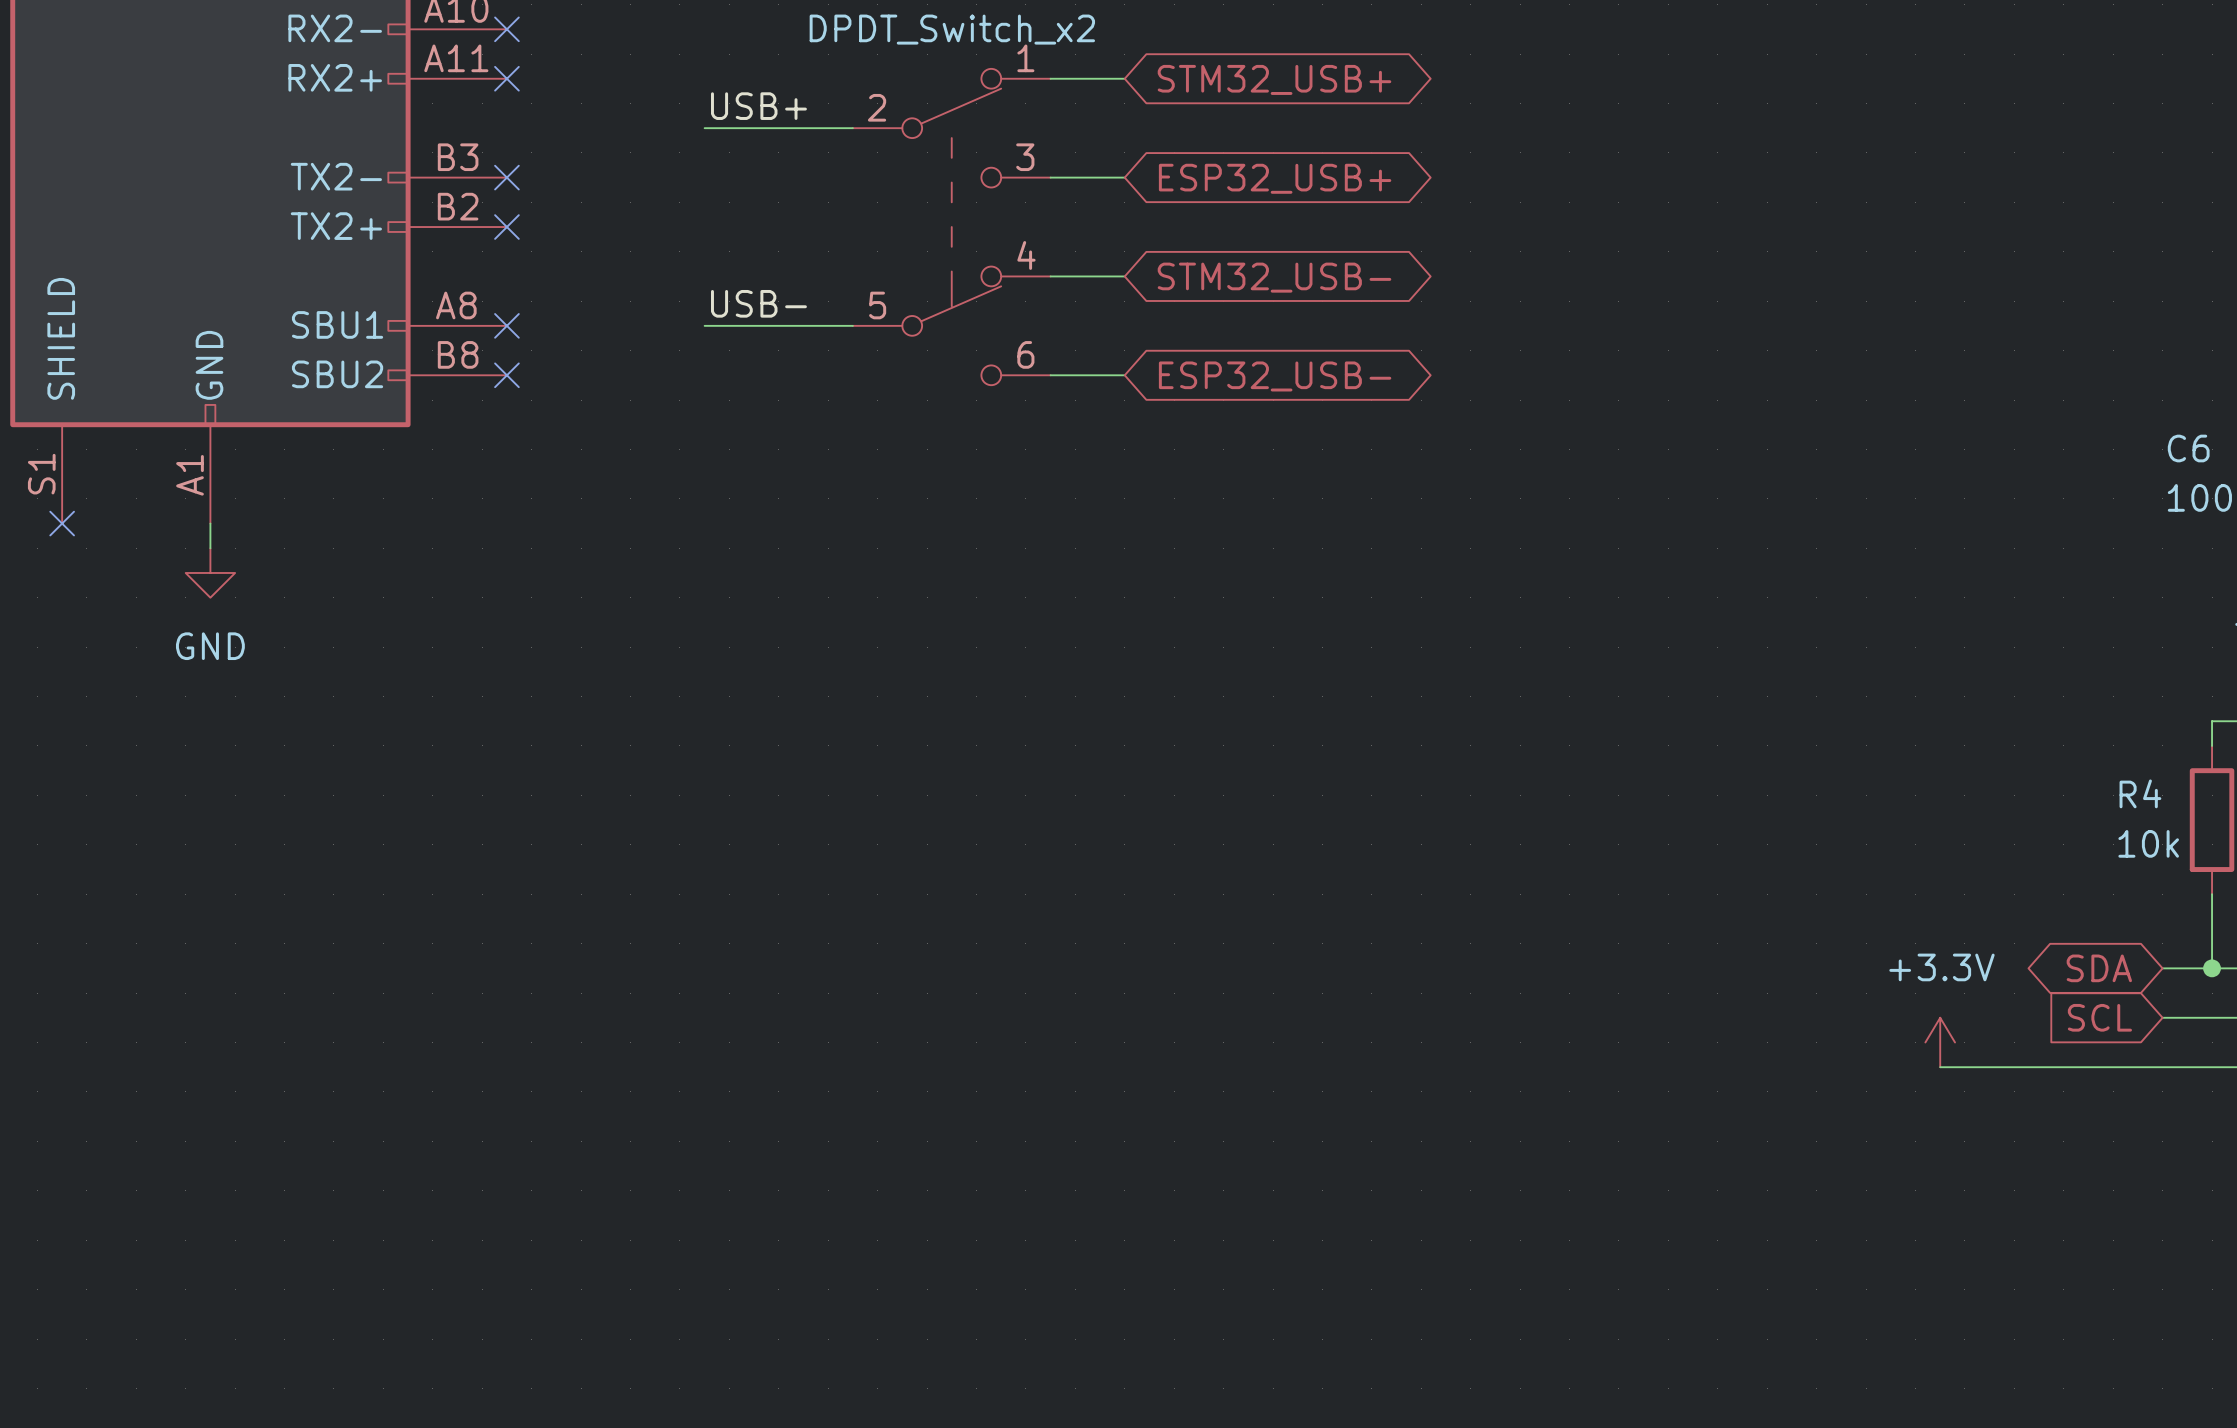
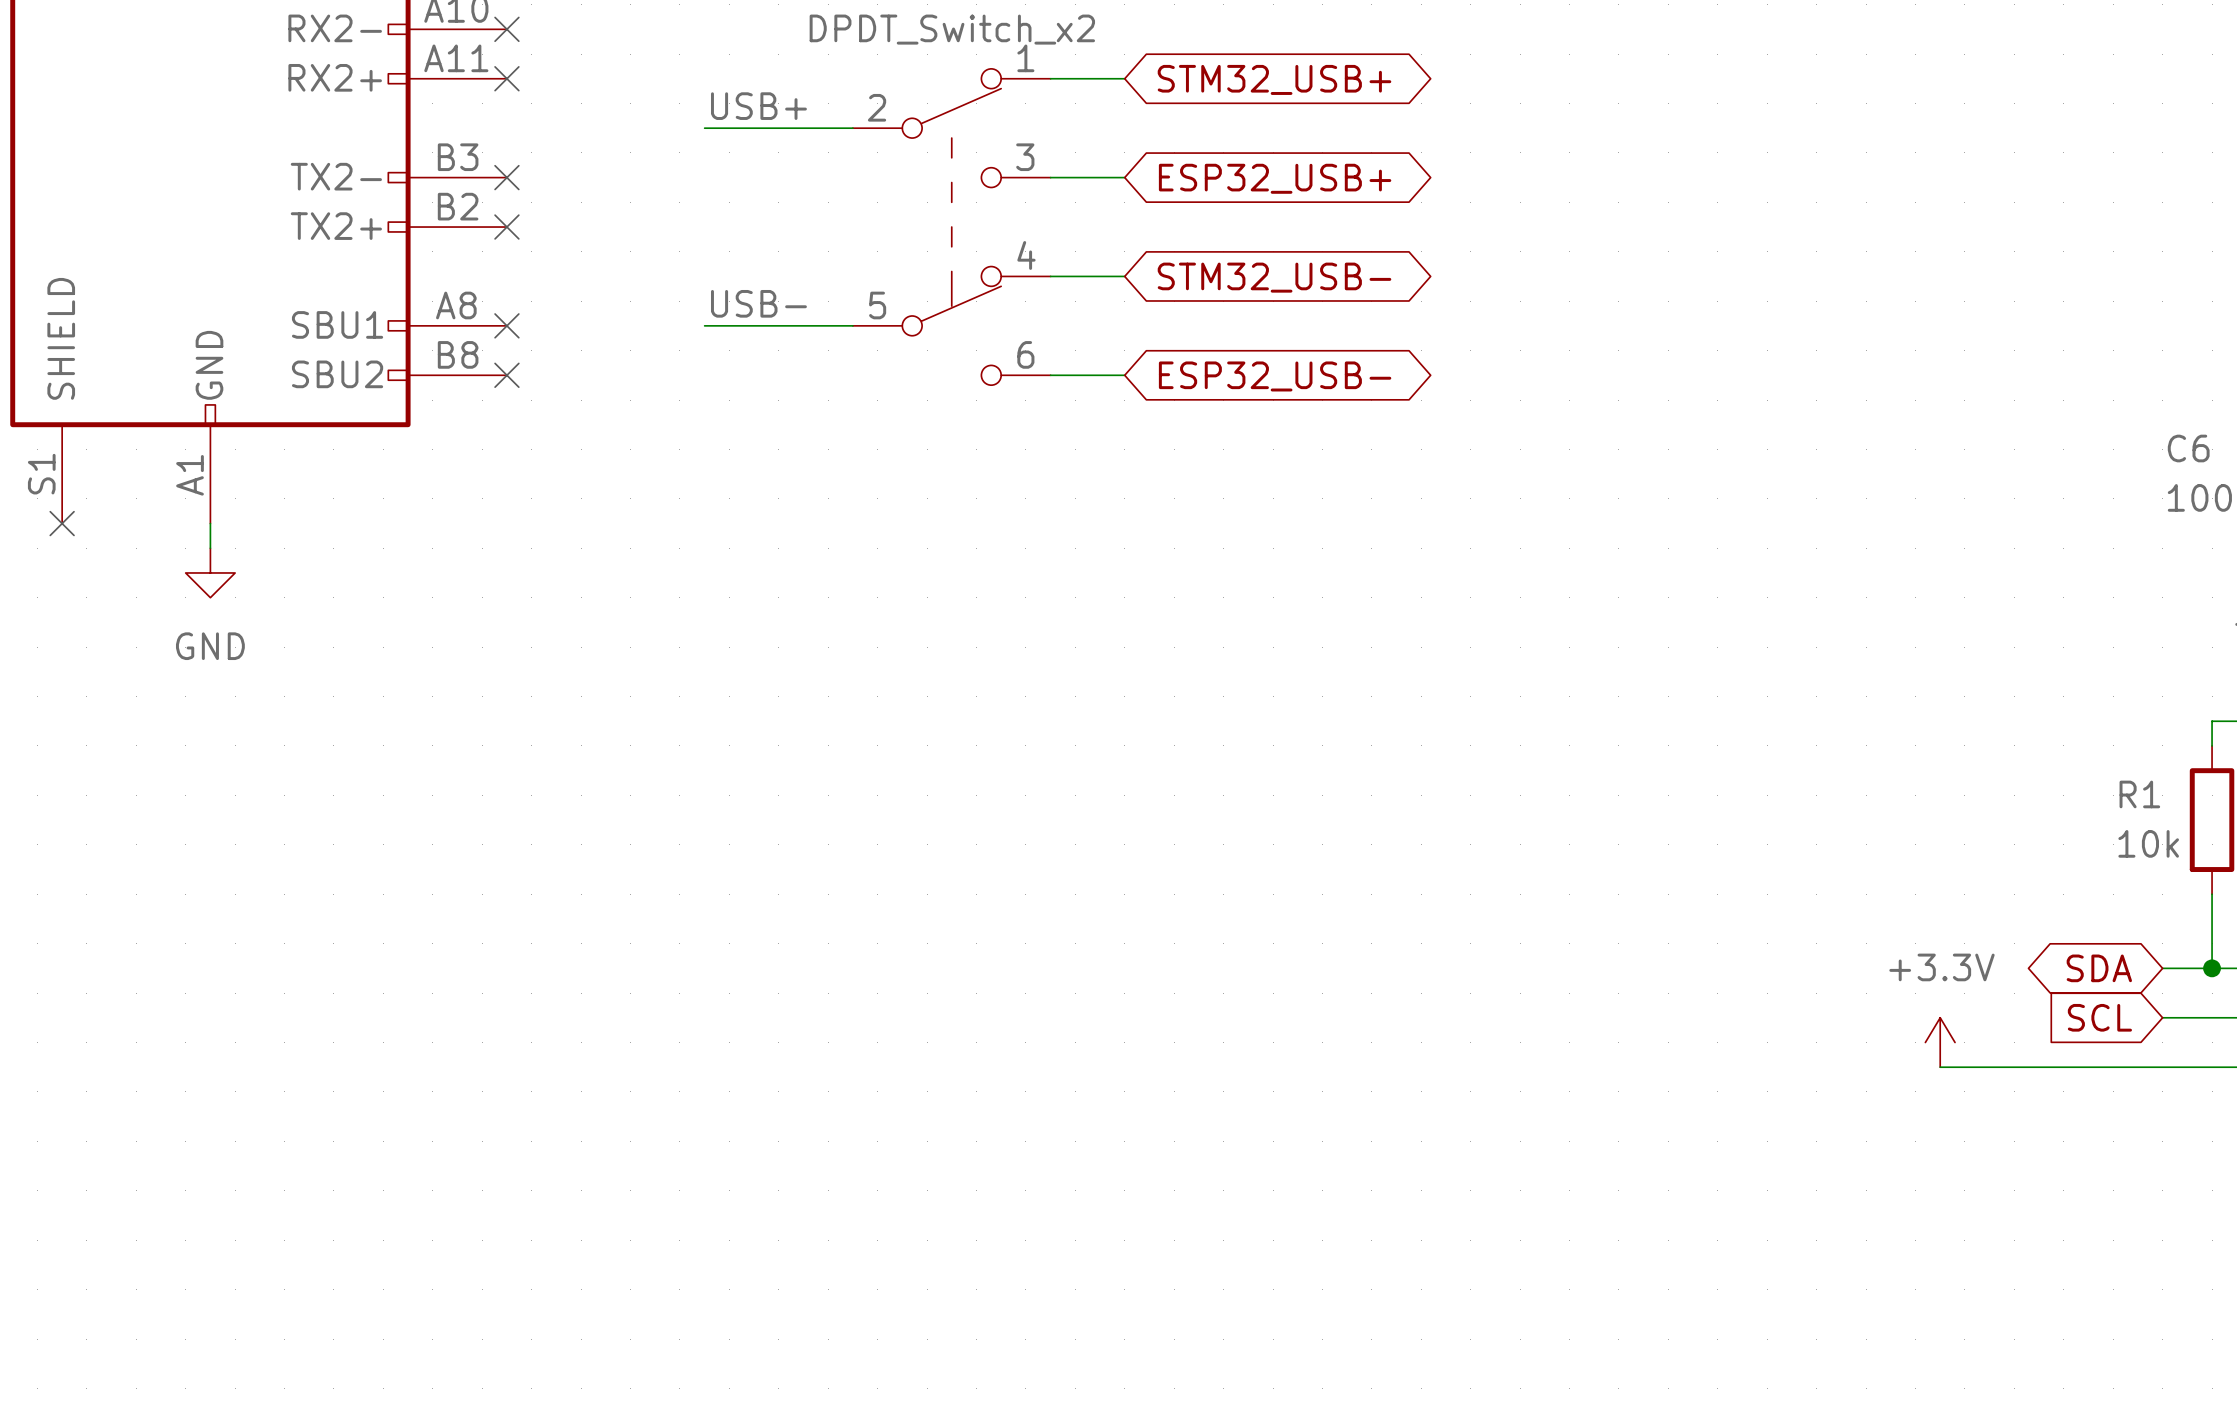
R4 name: R4 (2140, 793) -> R1 (2139, 794)

